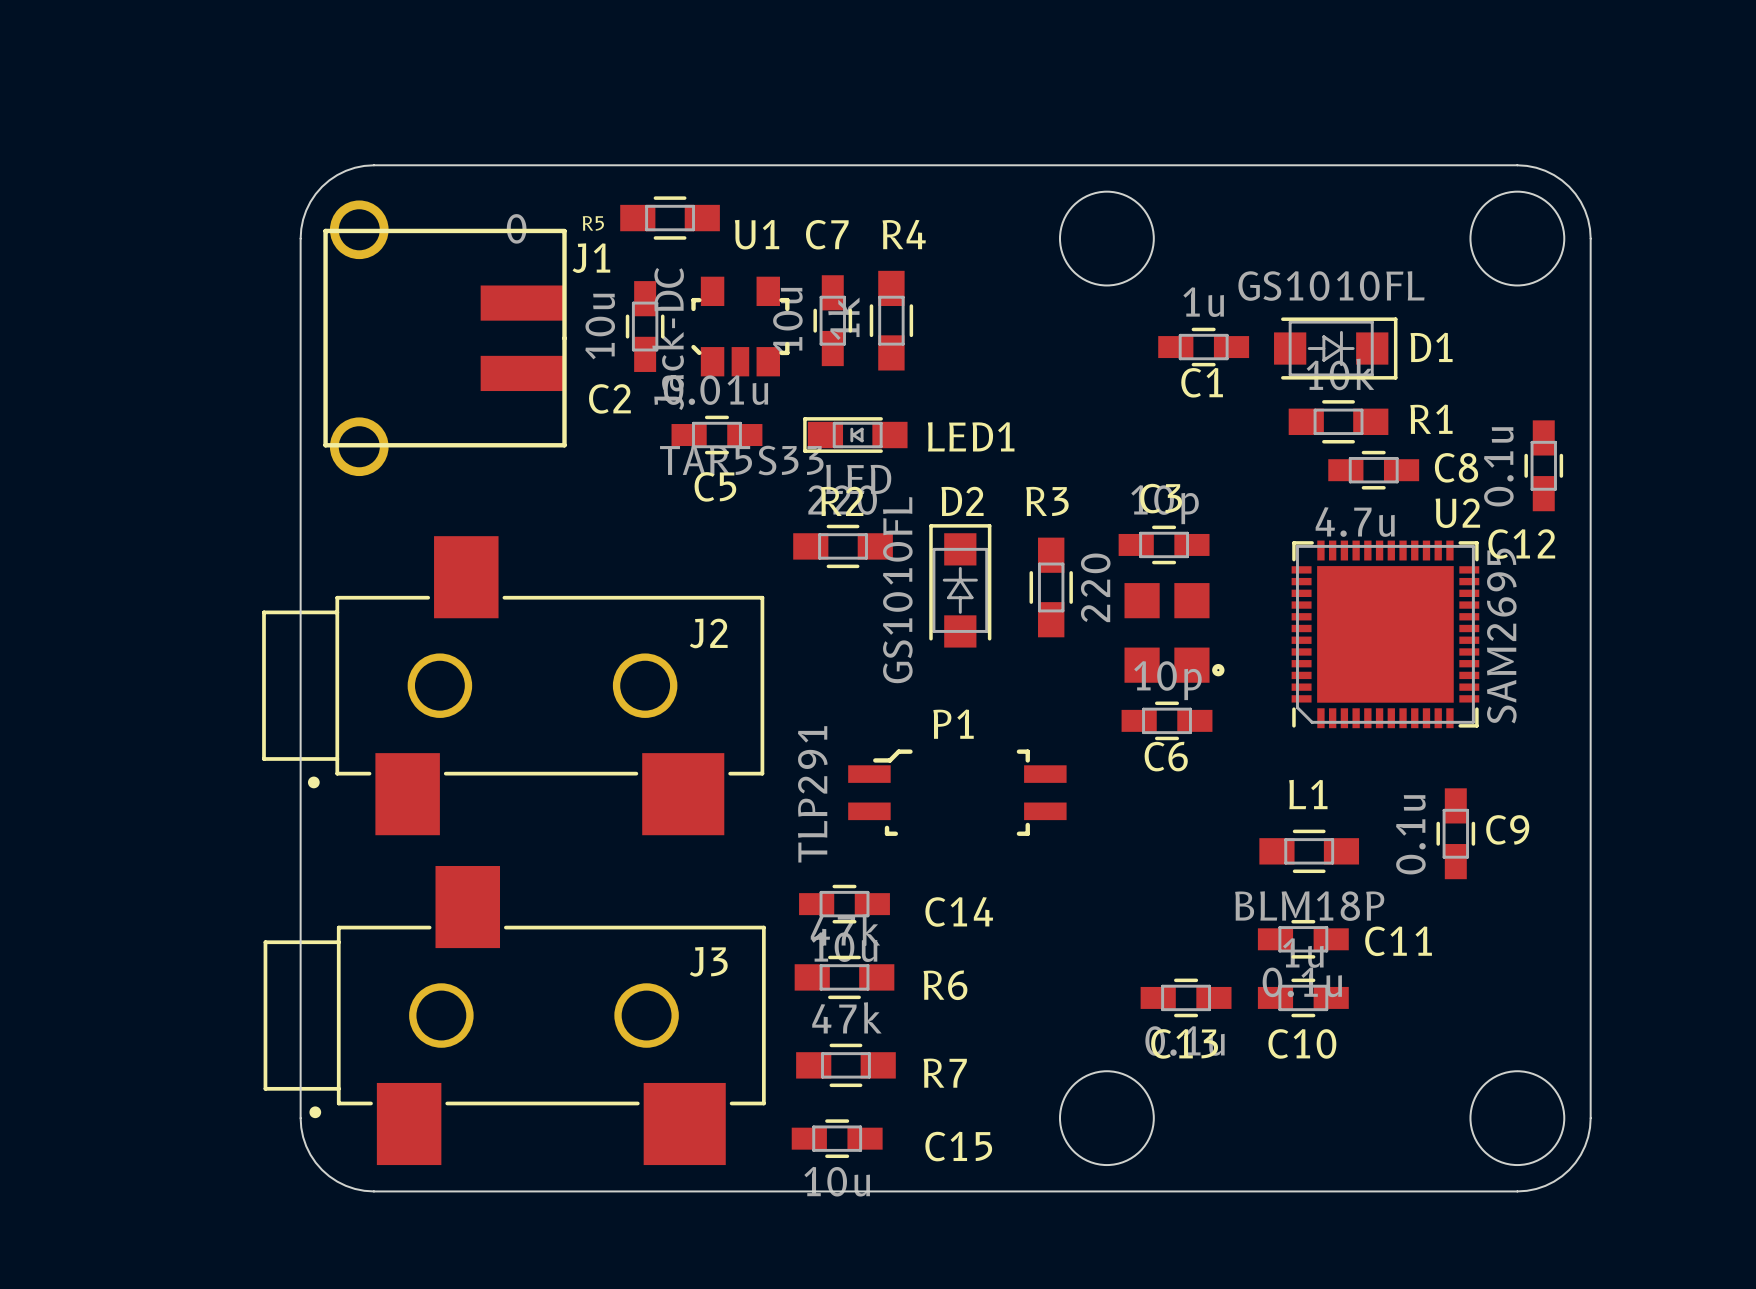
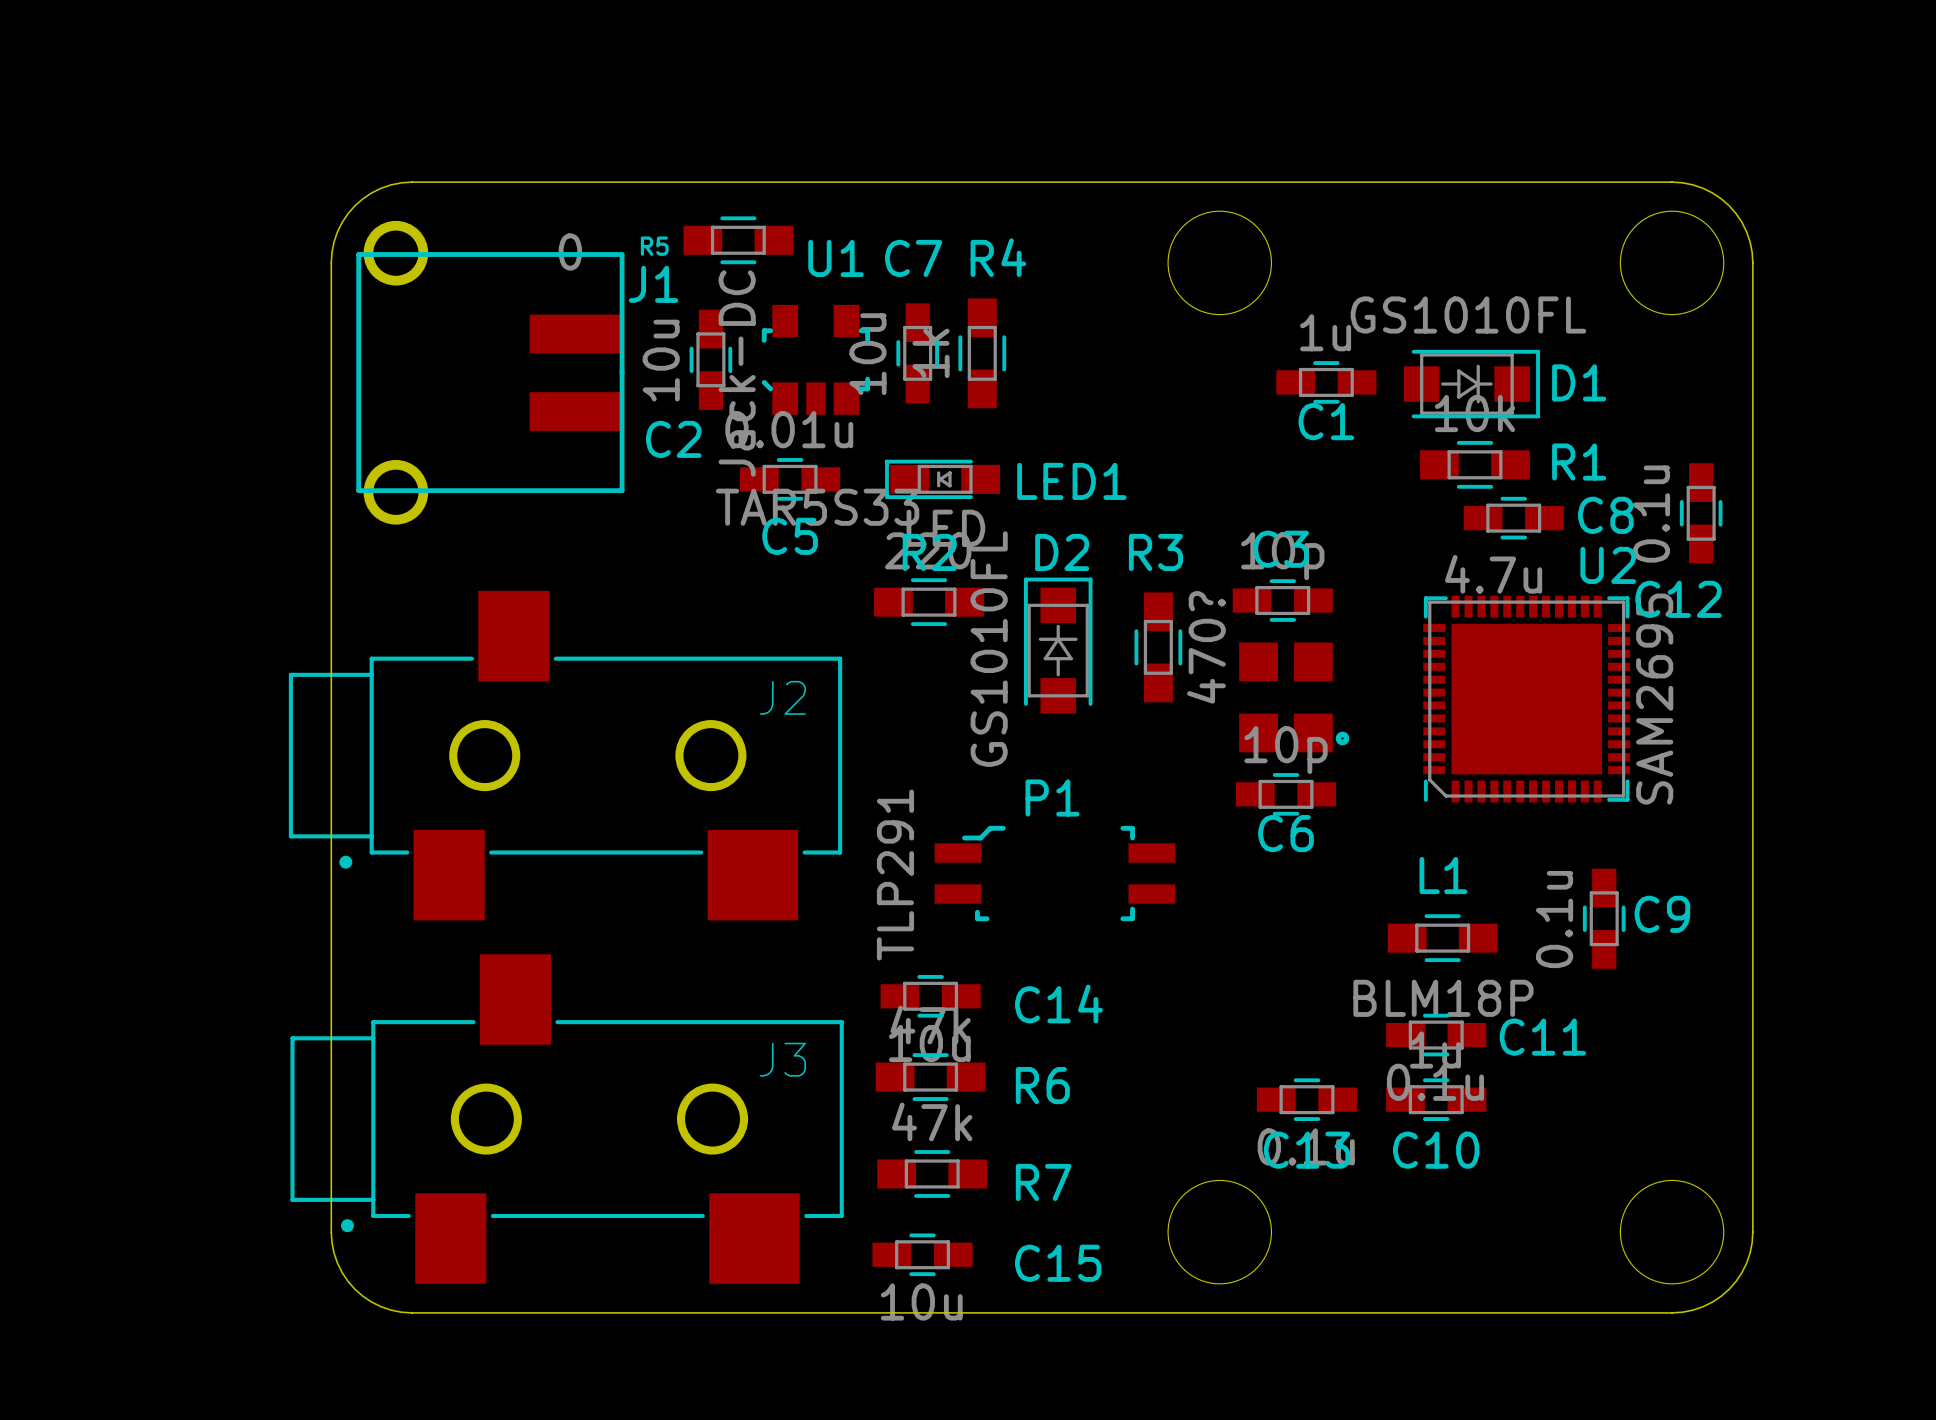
R3 value: 220 (1095, 587) -> 470? (1206, 647)

